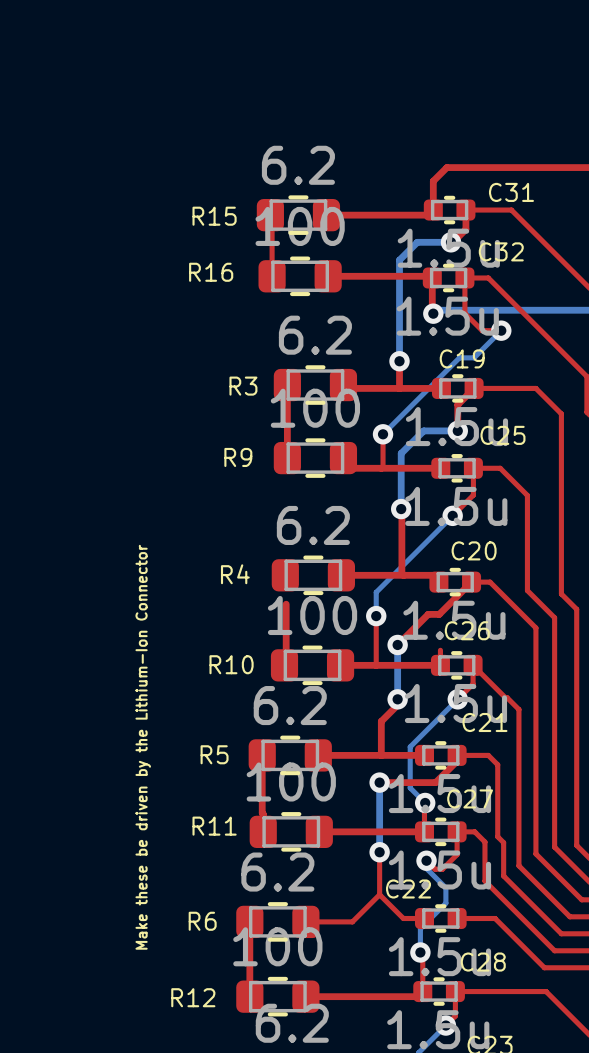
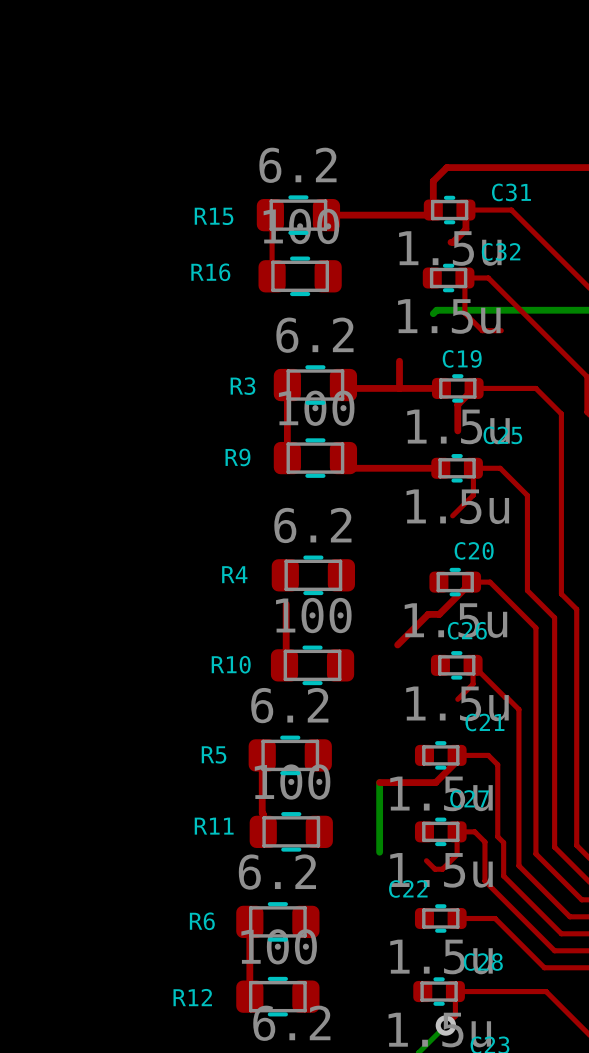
bottom track: (450, 242) (417, 242) (399, 260) (399, 361) -> none
via: (450, 242) -> none
top track: (328, 276) (430, 276) (432, 278) (433, 313) -> none
via: (433, 313) -> none
bottom track: (501, 330) (474, 357) (459, 357) (383, 434) -> none
via: (501, 330) -> none
via: (399, 361) -> none
bottom track: (457, 430) (423, 430) (401, 453) (401, 509) -> none
via: (457, 430) -> none
top track: (383, 434) (383, 466) (381, 468) -> none
via: (383, 434) -> none
top track: (401, 509) (401, 573) (403, 575) -> none
via: (401, 509) -> none
bottom track: (452, 515) (376, 592) (376, 616) -> none
via: (452, 515) -> none
top track: (341, 575) (432, 575) (438, 582) -> none
top track: (376, 616) (376, 665) -> none
via: (376, 616) -> none
bottom track: (397, 644) (397, 699) -> none
via: (397, 644) -> none
top track: (440, 650) (440, 665) (340, 665) -> none
top track: (397, 699) (397, 705) (381, 721) (381, 755) -> none
via: (397, 699) -> none
bottom track: (457, 699) (410, 746) (410, 787) (425, 802) -> none
via: (457, 699) -> none
text: Make these be driven by the Lithium-Ion Connector (143, 747) -> none
top track: (318, 755) (424, 755) -> none
via: (379, 782) -> none
top track: (425, 802) (424, 831) (319, 831) -> none
via: (425, 802) -> none
top track: (379, 852) (379, 894) -> none
via: (379, 852) -> none
bottom track: (426, 860) (426, 868) (445, 887) (445, 903) (420, 928) (420, 952) -> none
via: (426, 860) -> none
top track: (379, 894) (403, 918) (424, 918) (422, 916) -> none
top track: (379, 894) (352, 921) (305, 921) -> none
top track: (420, 952) (422, 954) (422, 991) (417, 996) (305, 996) (312, 1003) -> none
via: (420, 952) -> none

